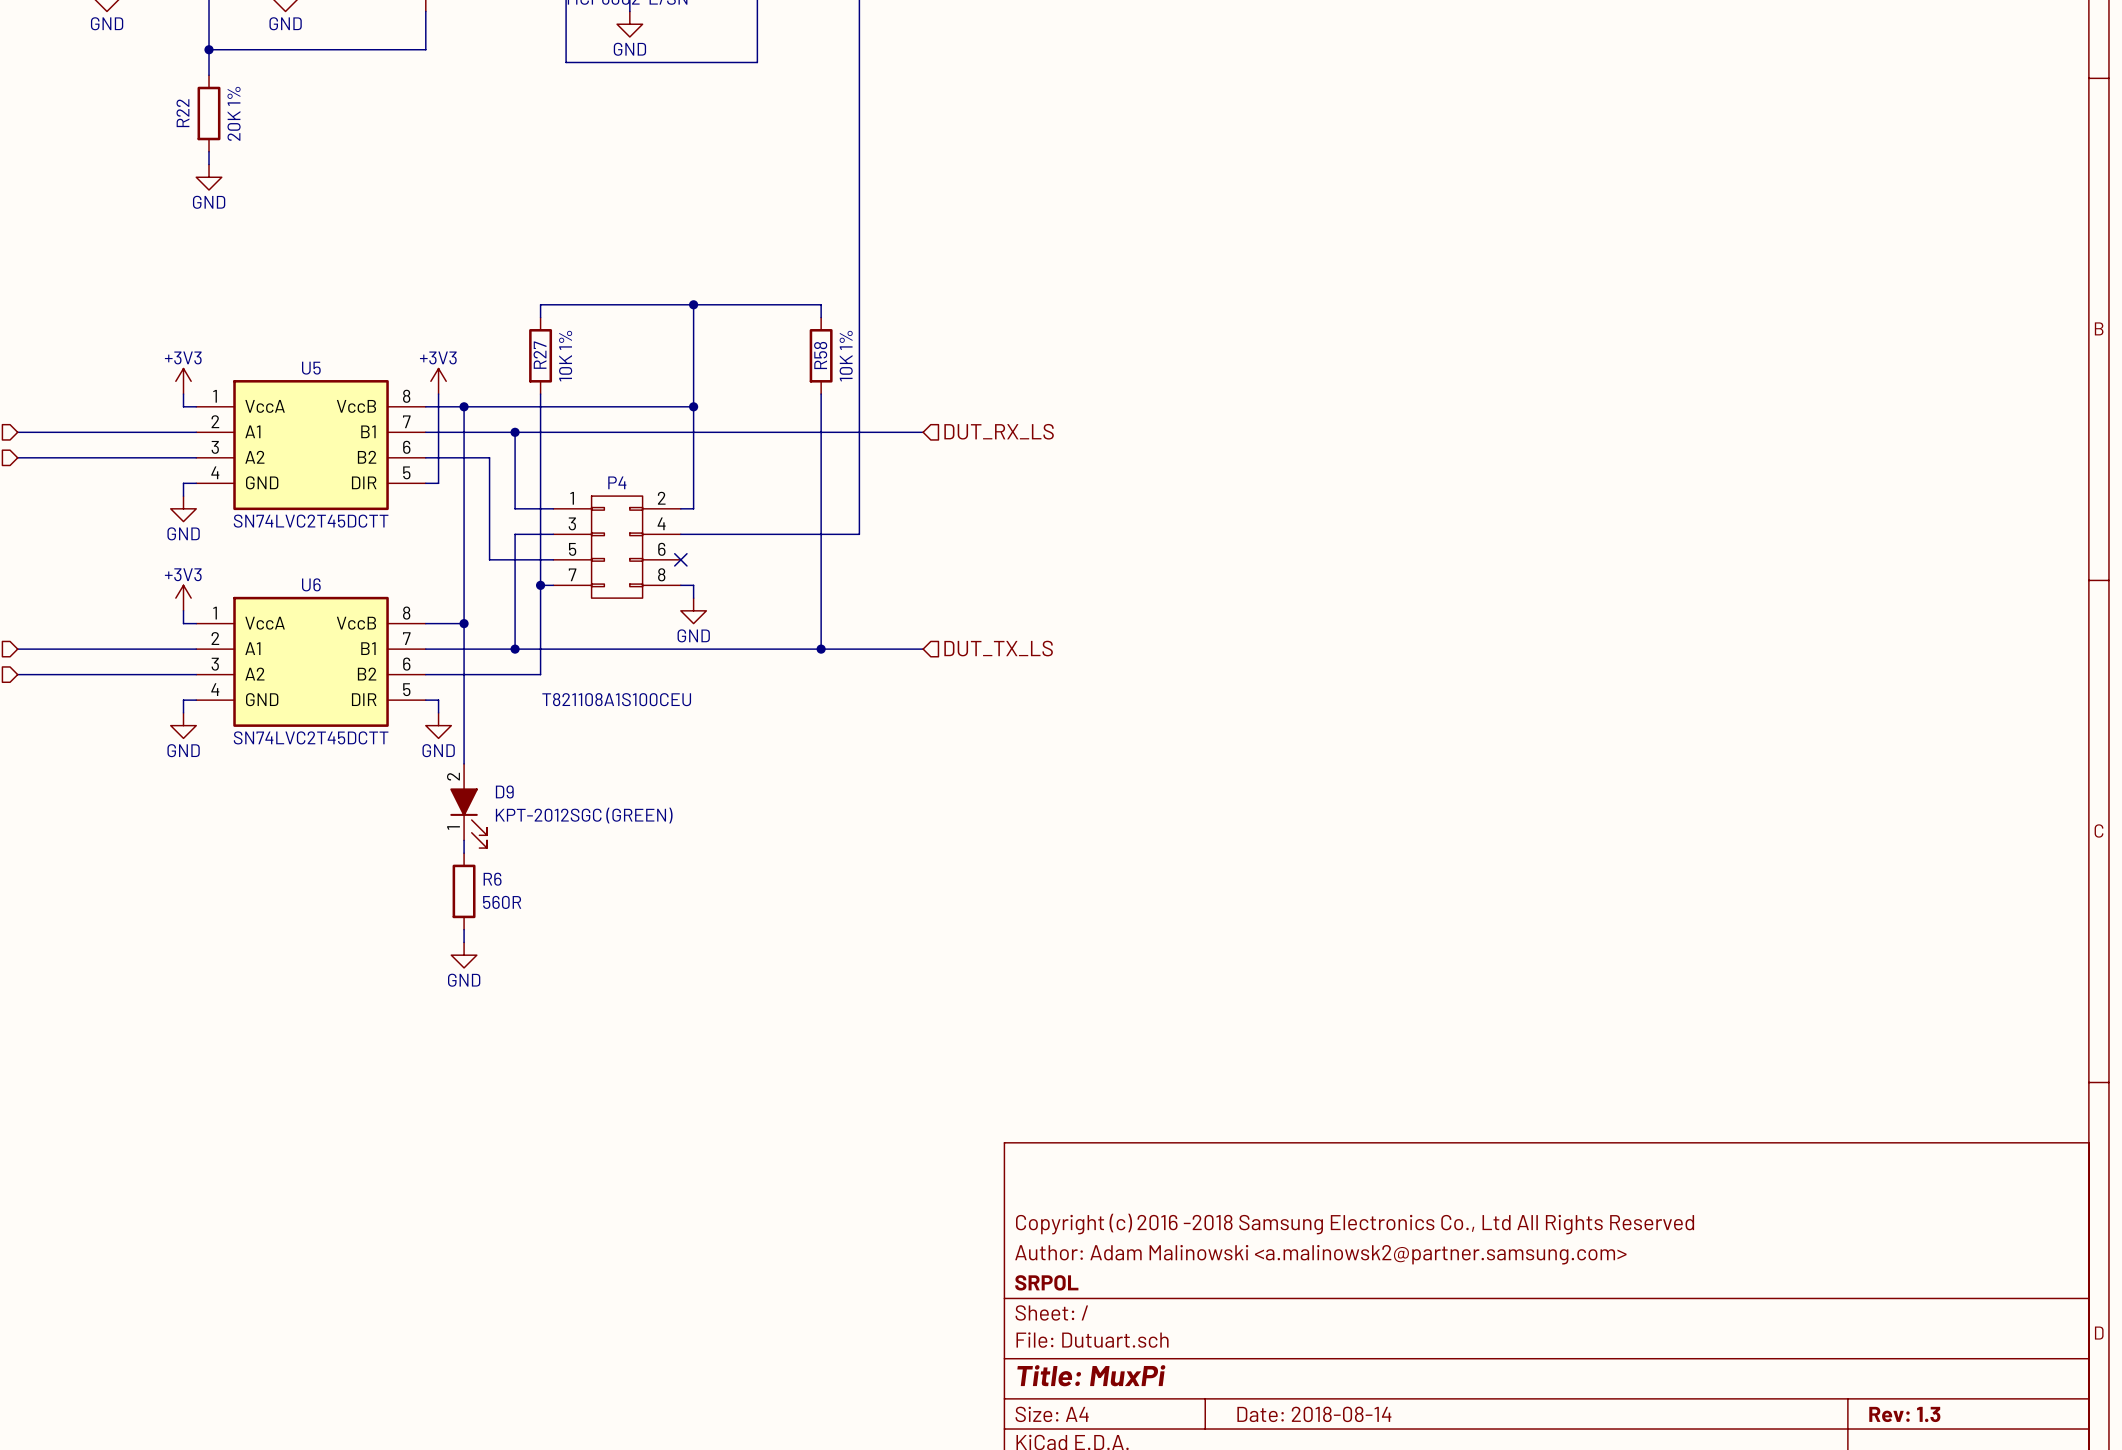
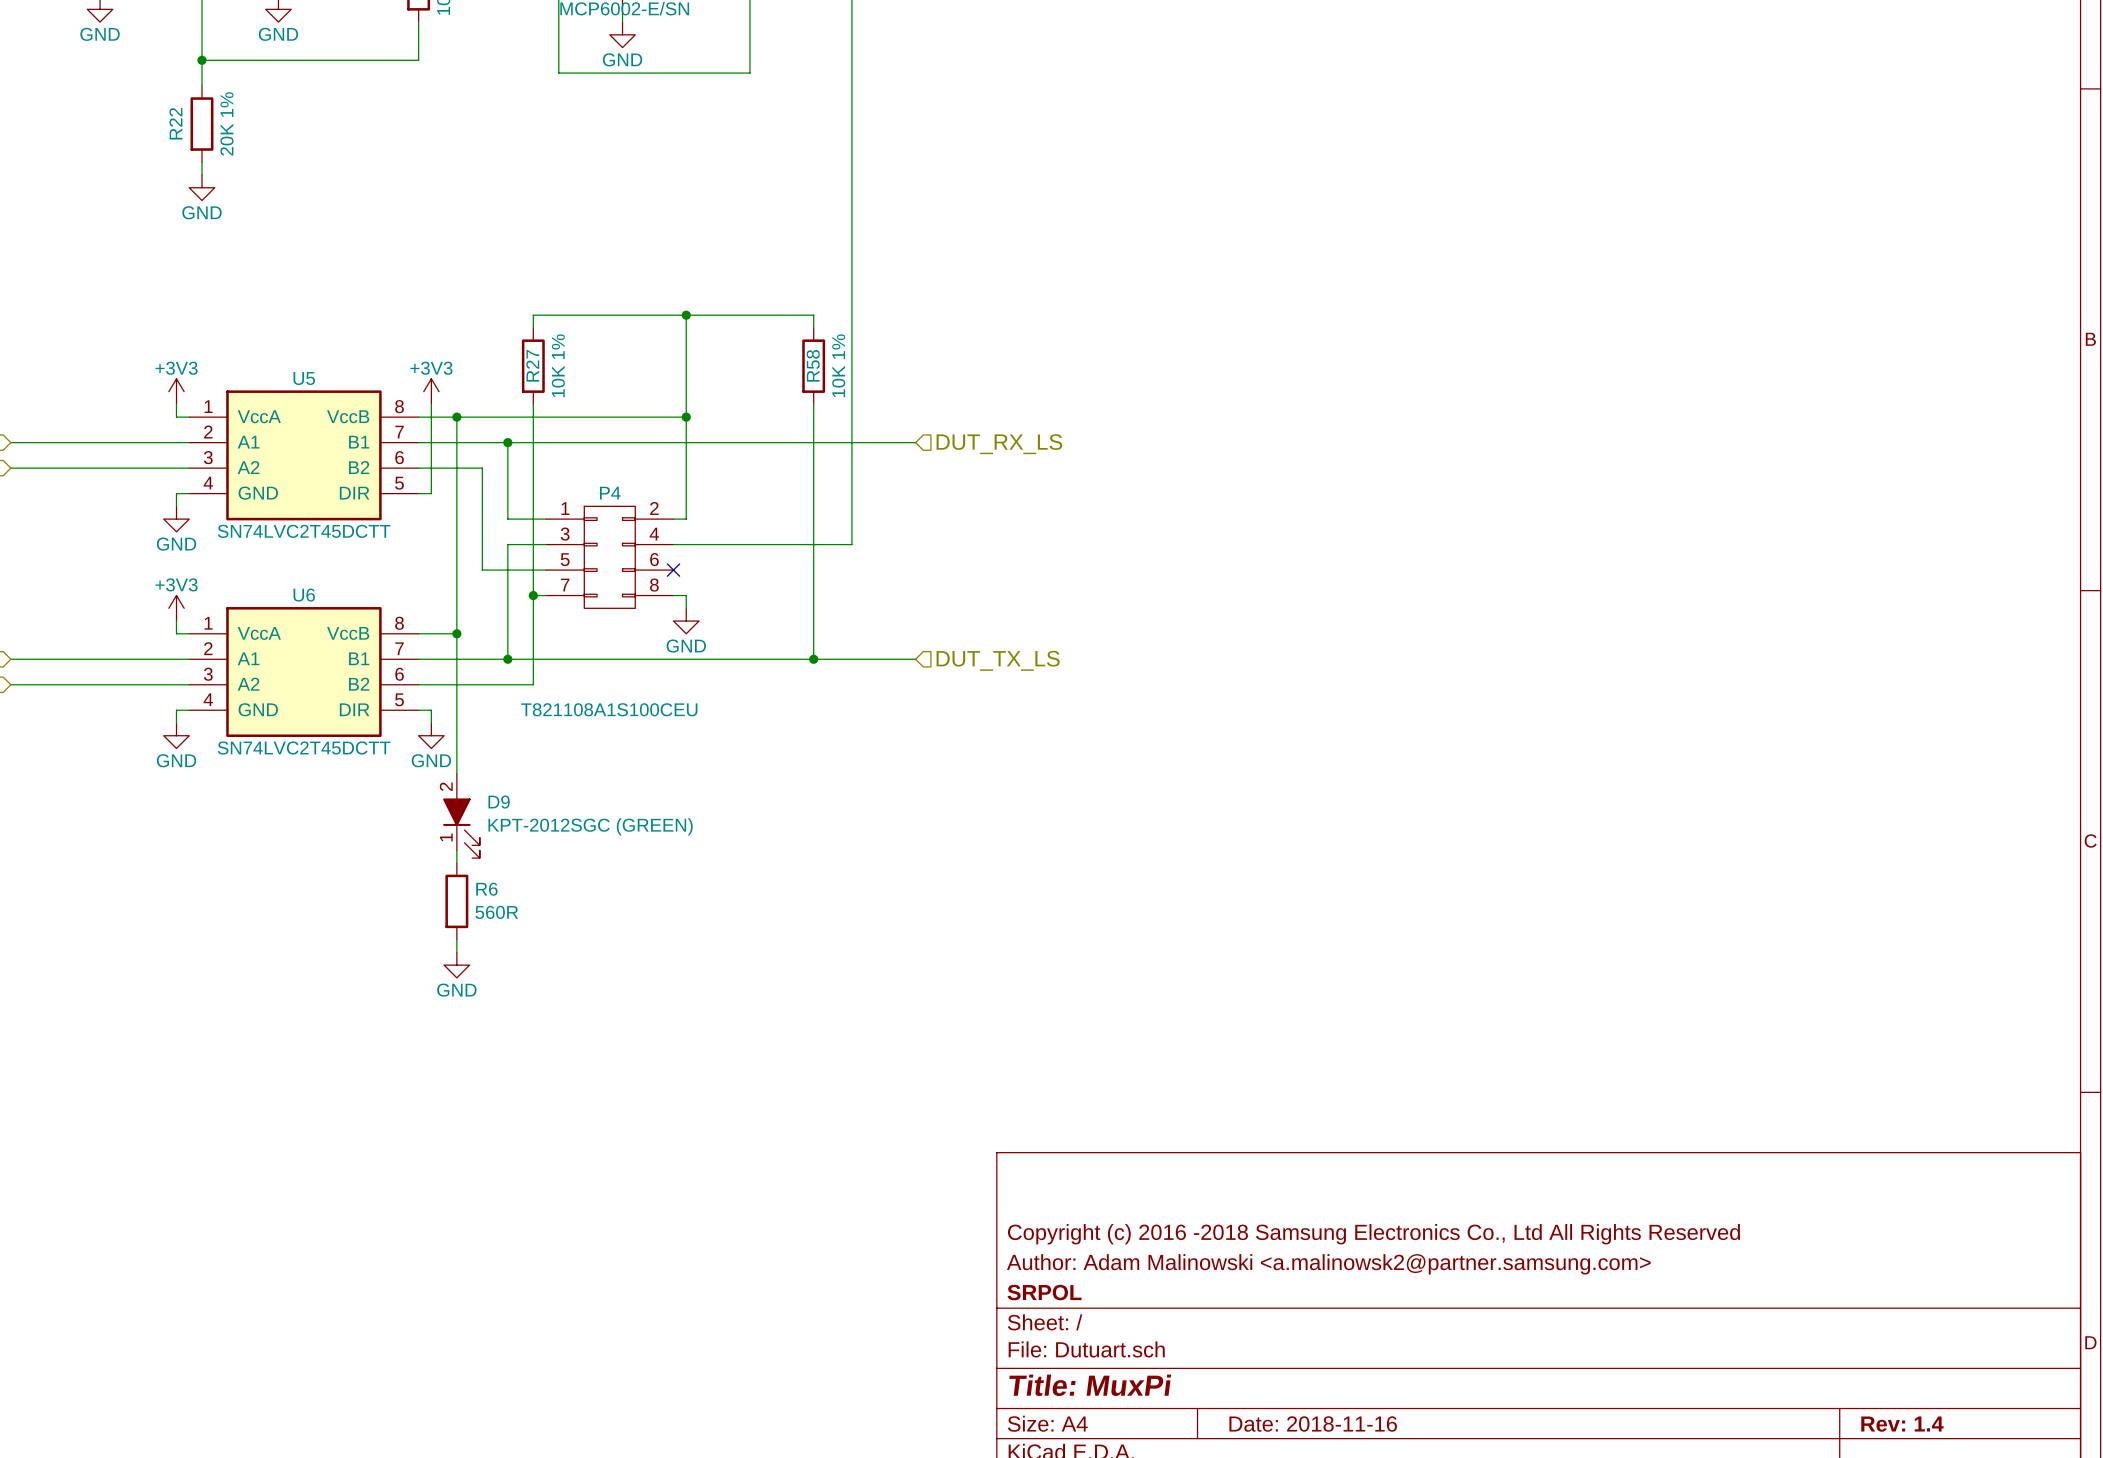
title block: Date: 2018-08-14 (1314, 1414) -> Date: 2018-11-16 (1313, 1424)
title block: Rev: 1.3 (1904, 1414) -> Rev: 1.4 (1902, 1424)

